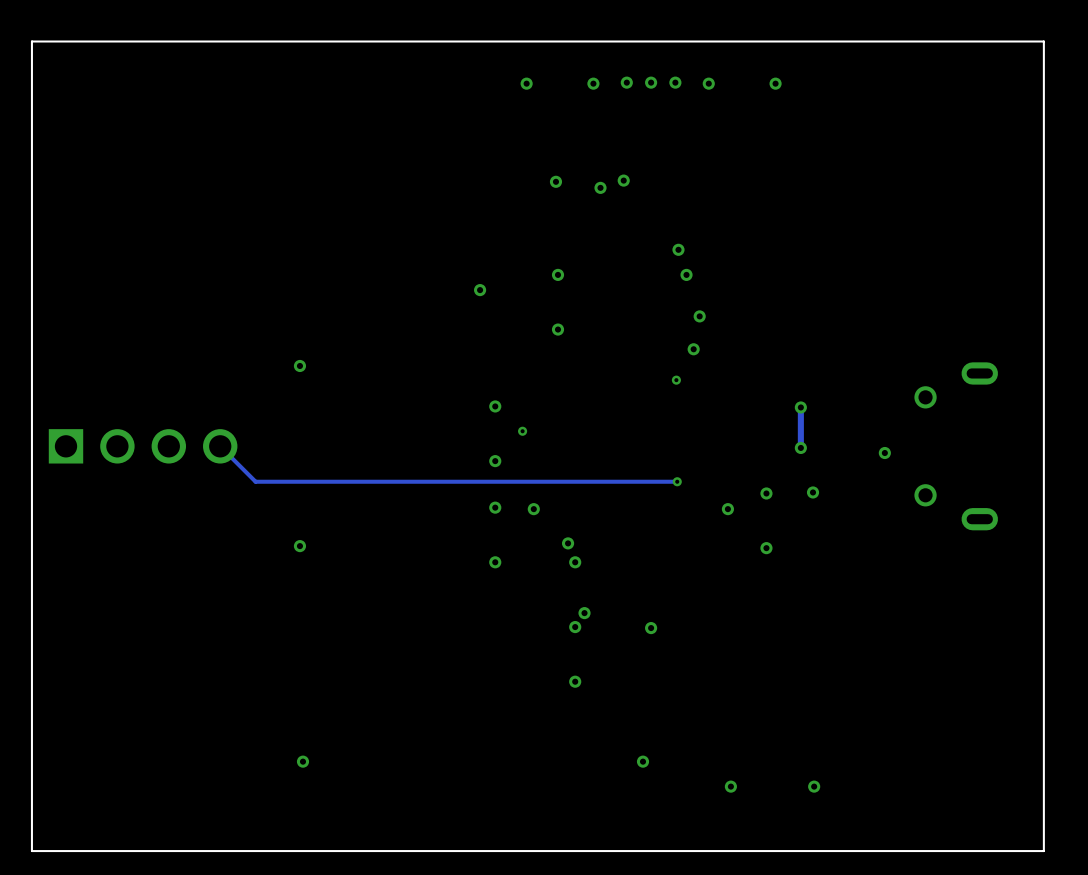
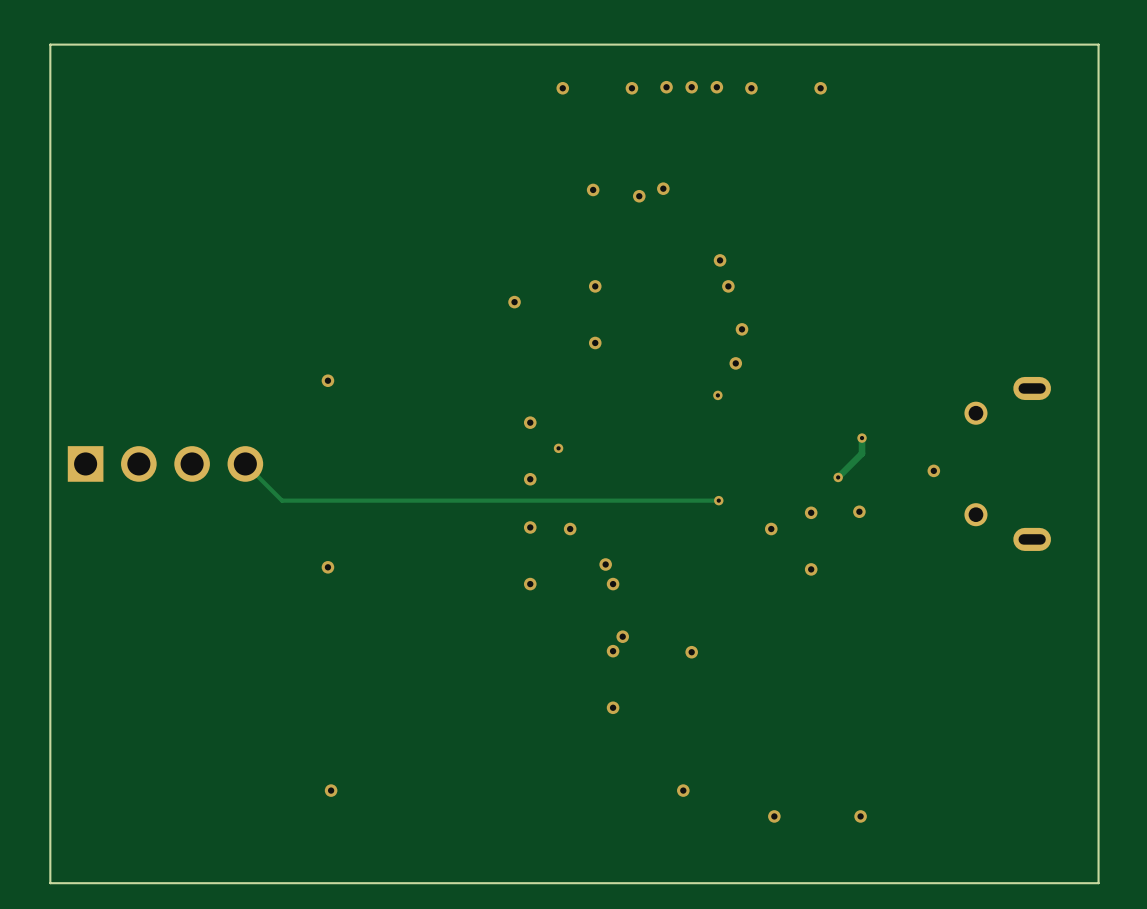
track: (800, 407) (800, 447) -> none
via: (800, 407) -> none
track: none -> (862, 438) (862, 453) (838, 477)
via: none -> (862, 438)
via: (800, 447) -> none
via: none -> (838, 477)

